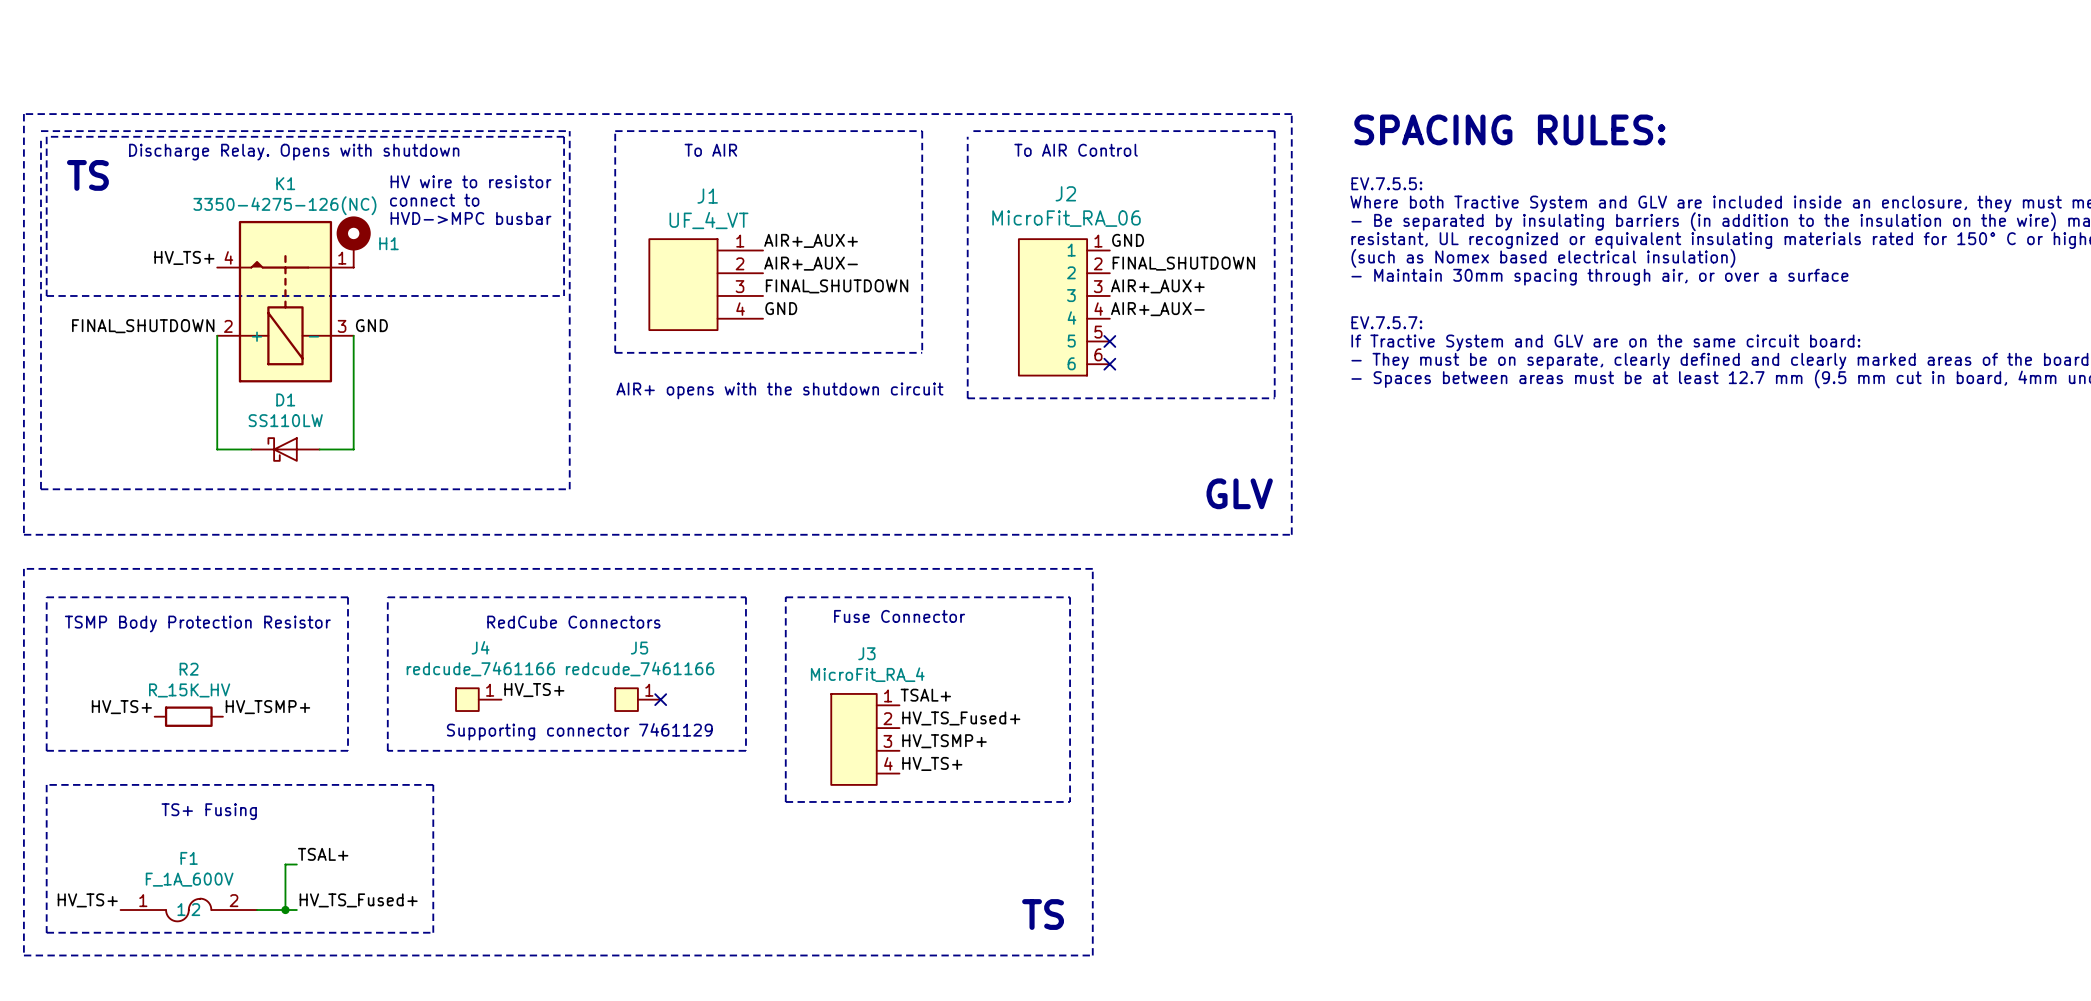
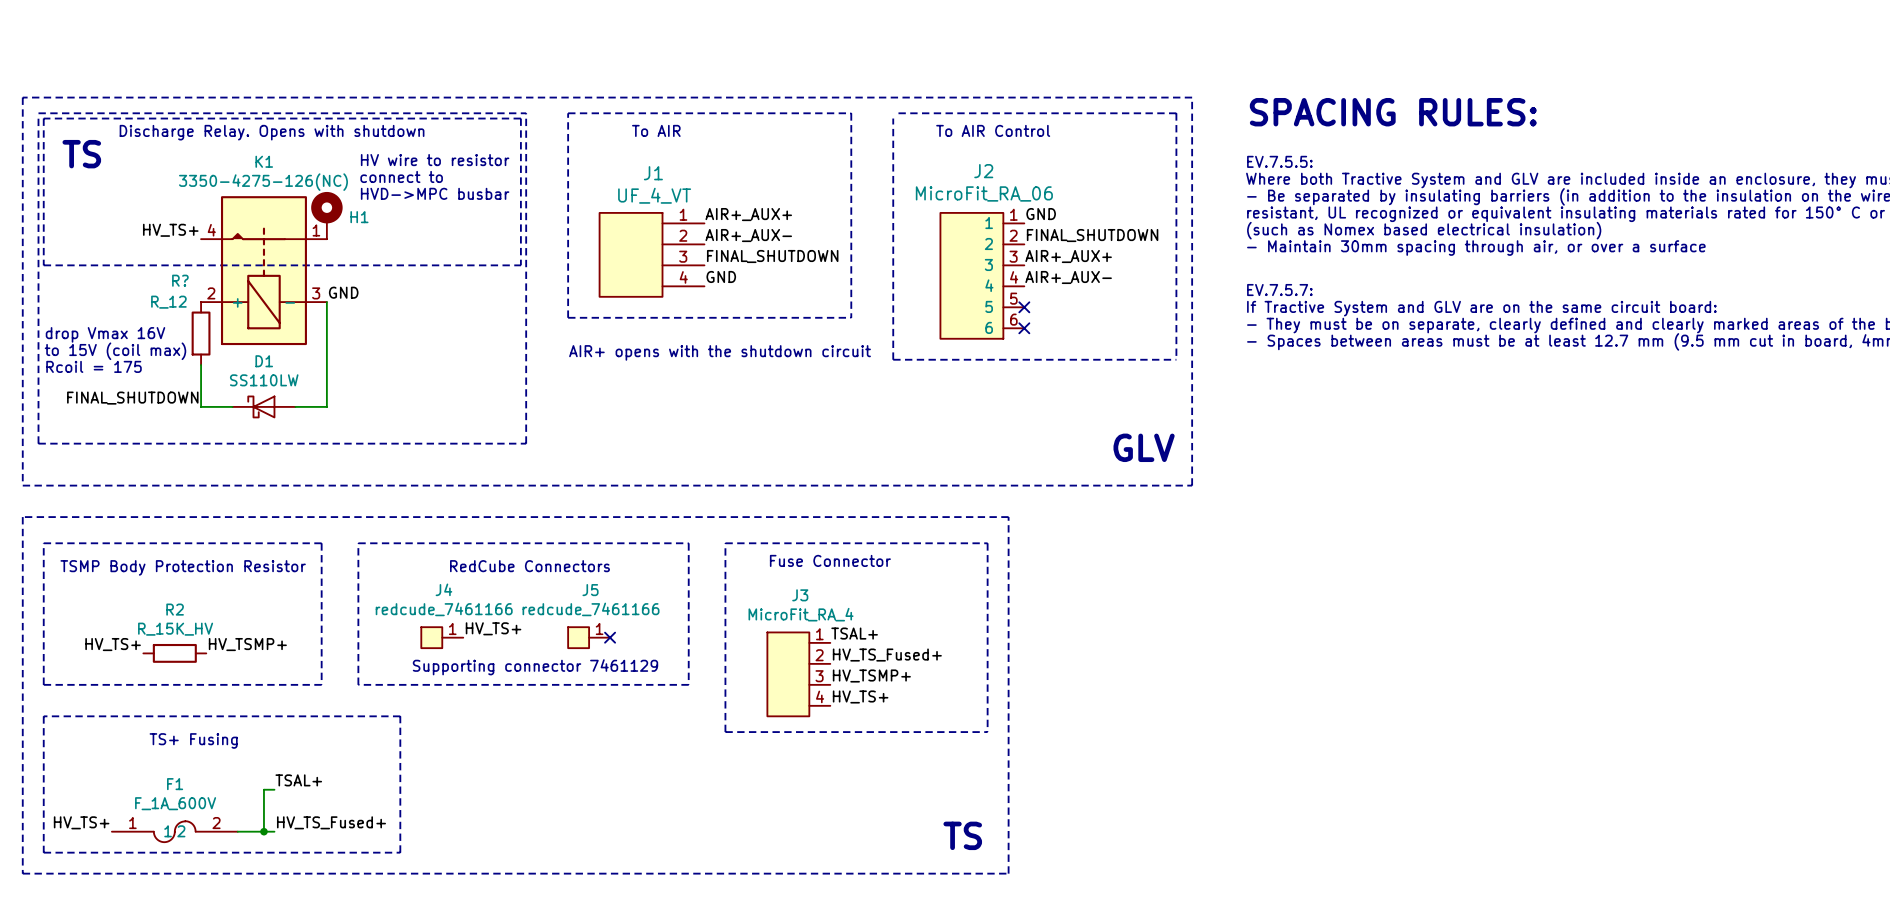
label position: FINAL_SHUTDOWN (143, 326) -> FINAL_SHUTDOWN (132, 398)
wire: (217, 335) (217, 404) -> none
R?: none -> R_12 (201, 333)
text: none -> drop Vmax 16V (105, 334)
text: none -> to 15V (coil max) (115, 351)
text: none -> Rcoil = 175 (94, 366)

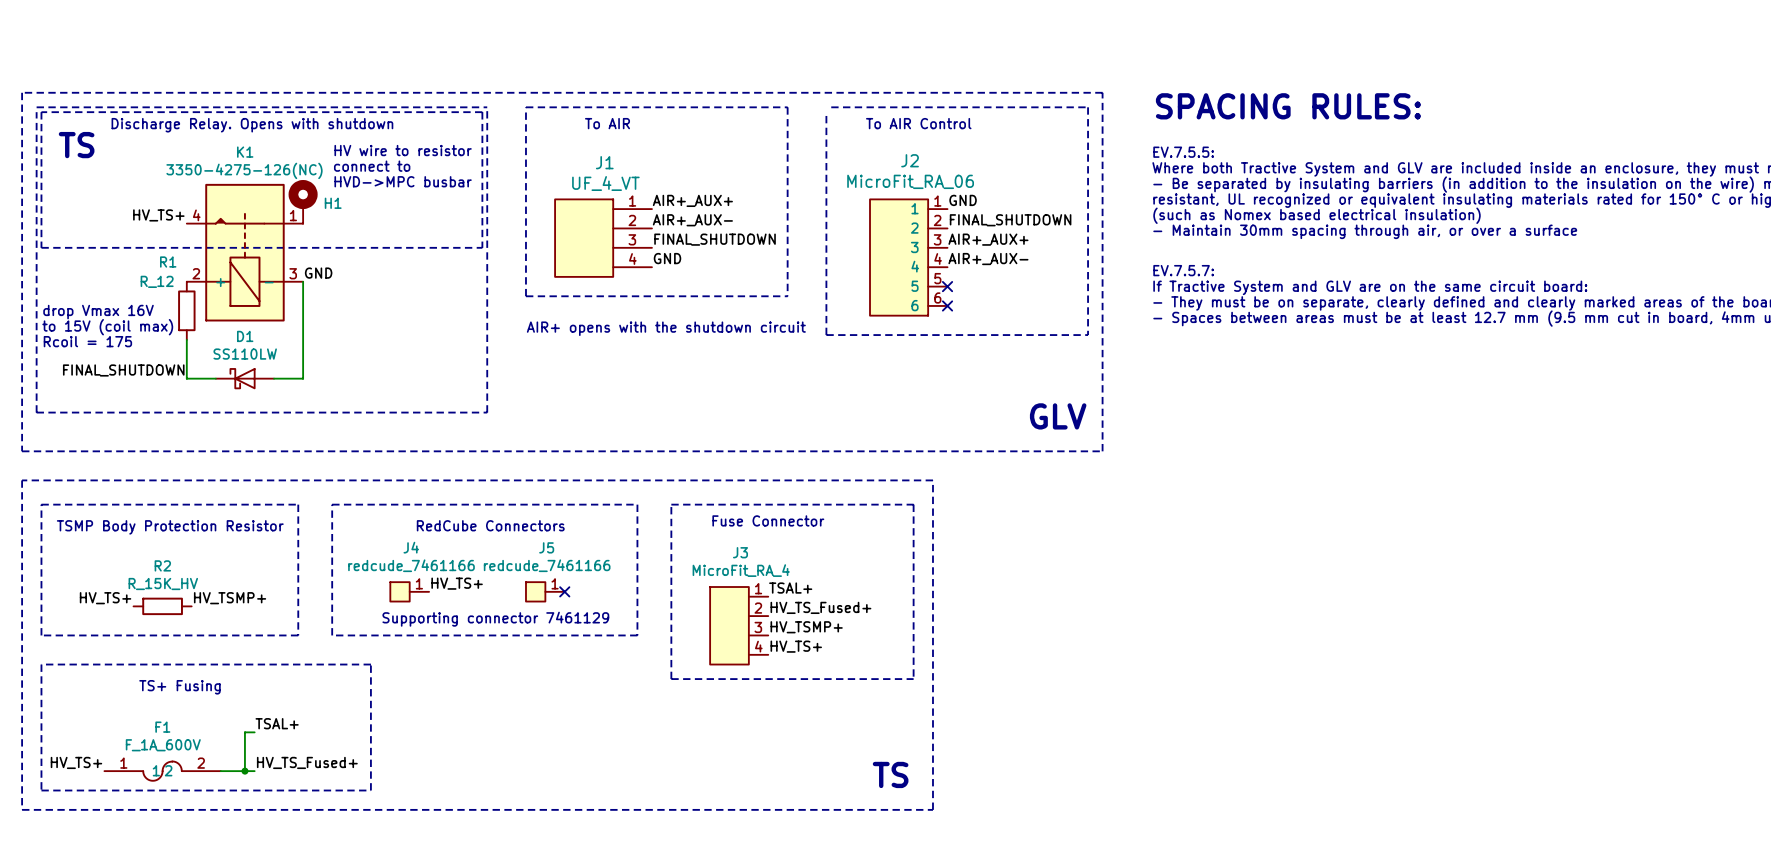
R? name: R? (180, 280) -> R1 (168, 262)

